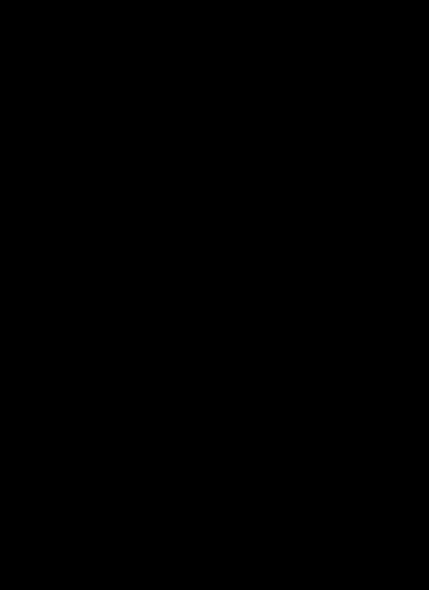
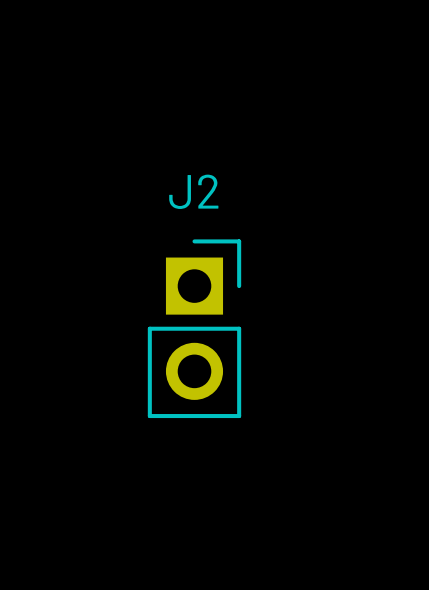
J2: none -> (194, 328)

